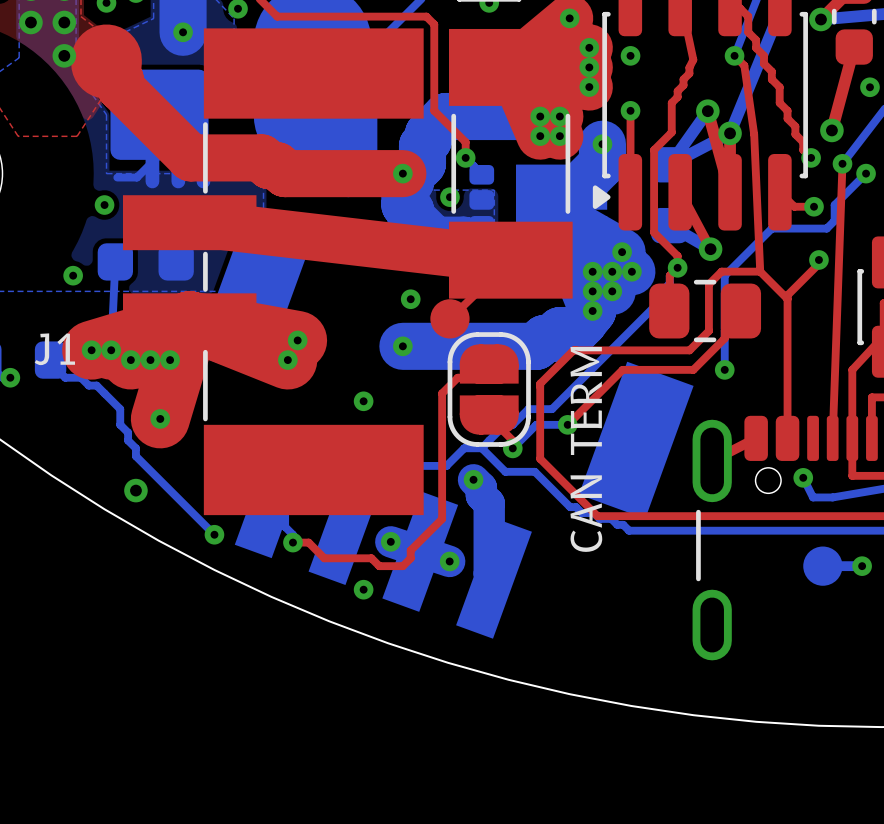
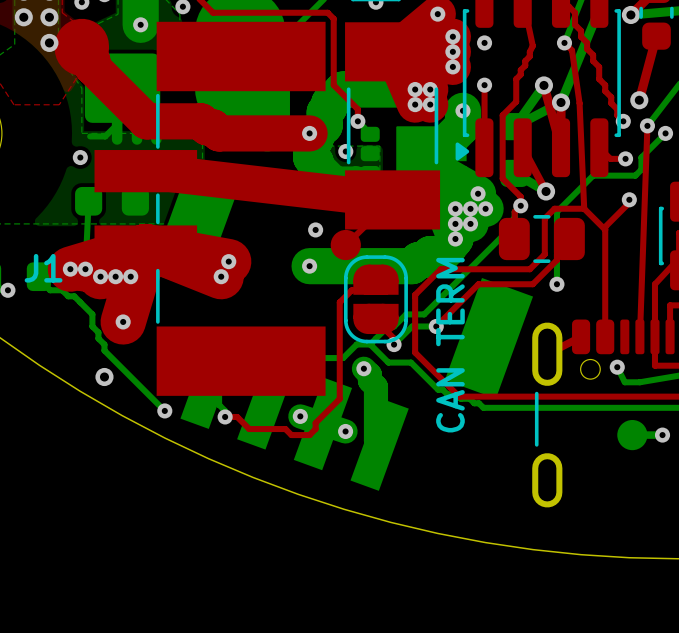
via: (869, 87) -> none
via: (73, 275) -> none
via: (363, 401) -> none
via: (363, 589) -> none

